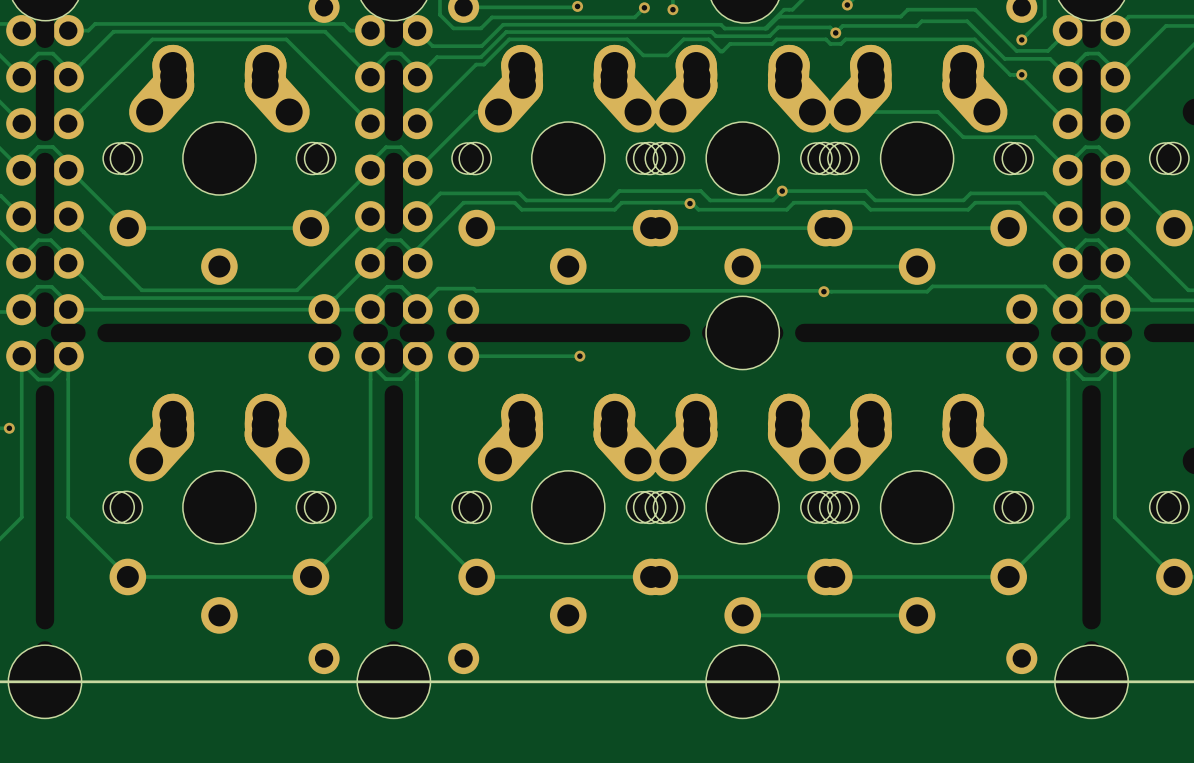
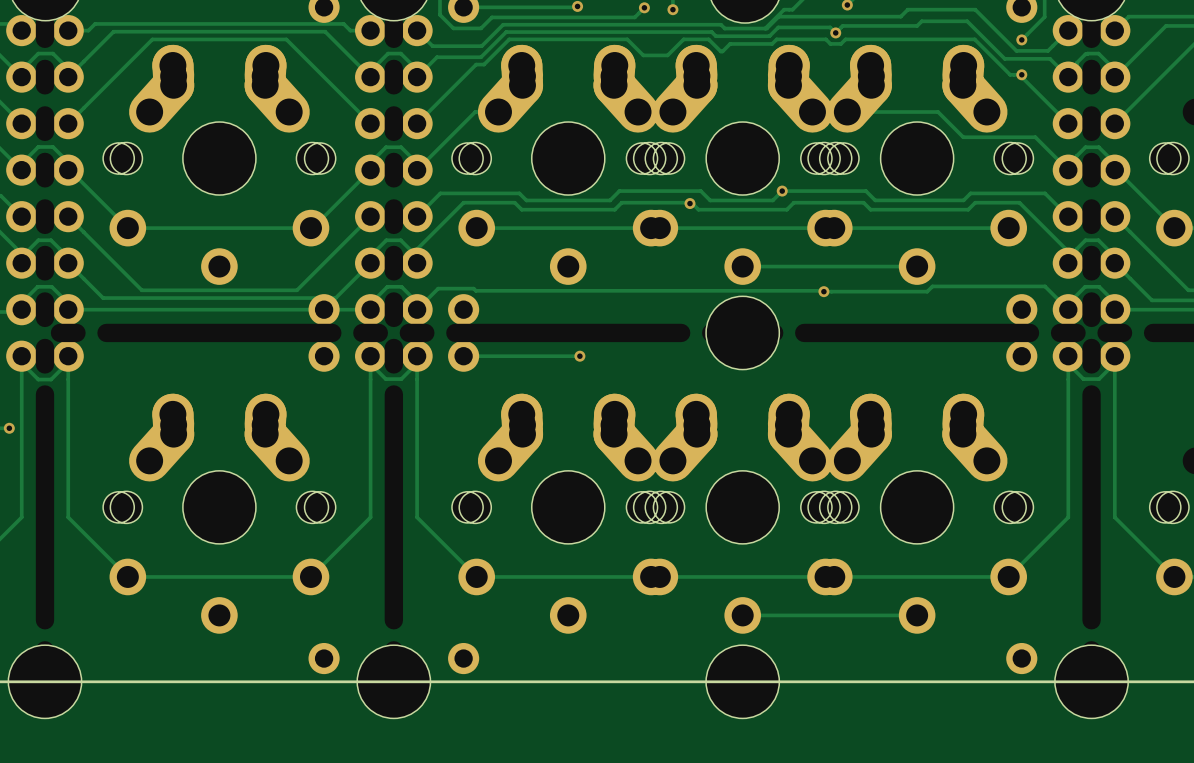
part footprint: [35, 13, 55, 328] -> [35, 13, 55, 328]
part footprint: [384, 13, 404, 328] -> [384, 13, 404, 328]
part footprint: [1082, 13, 1101, 328] -> [1082, 13, 1101, 328]

